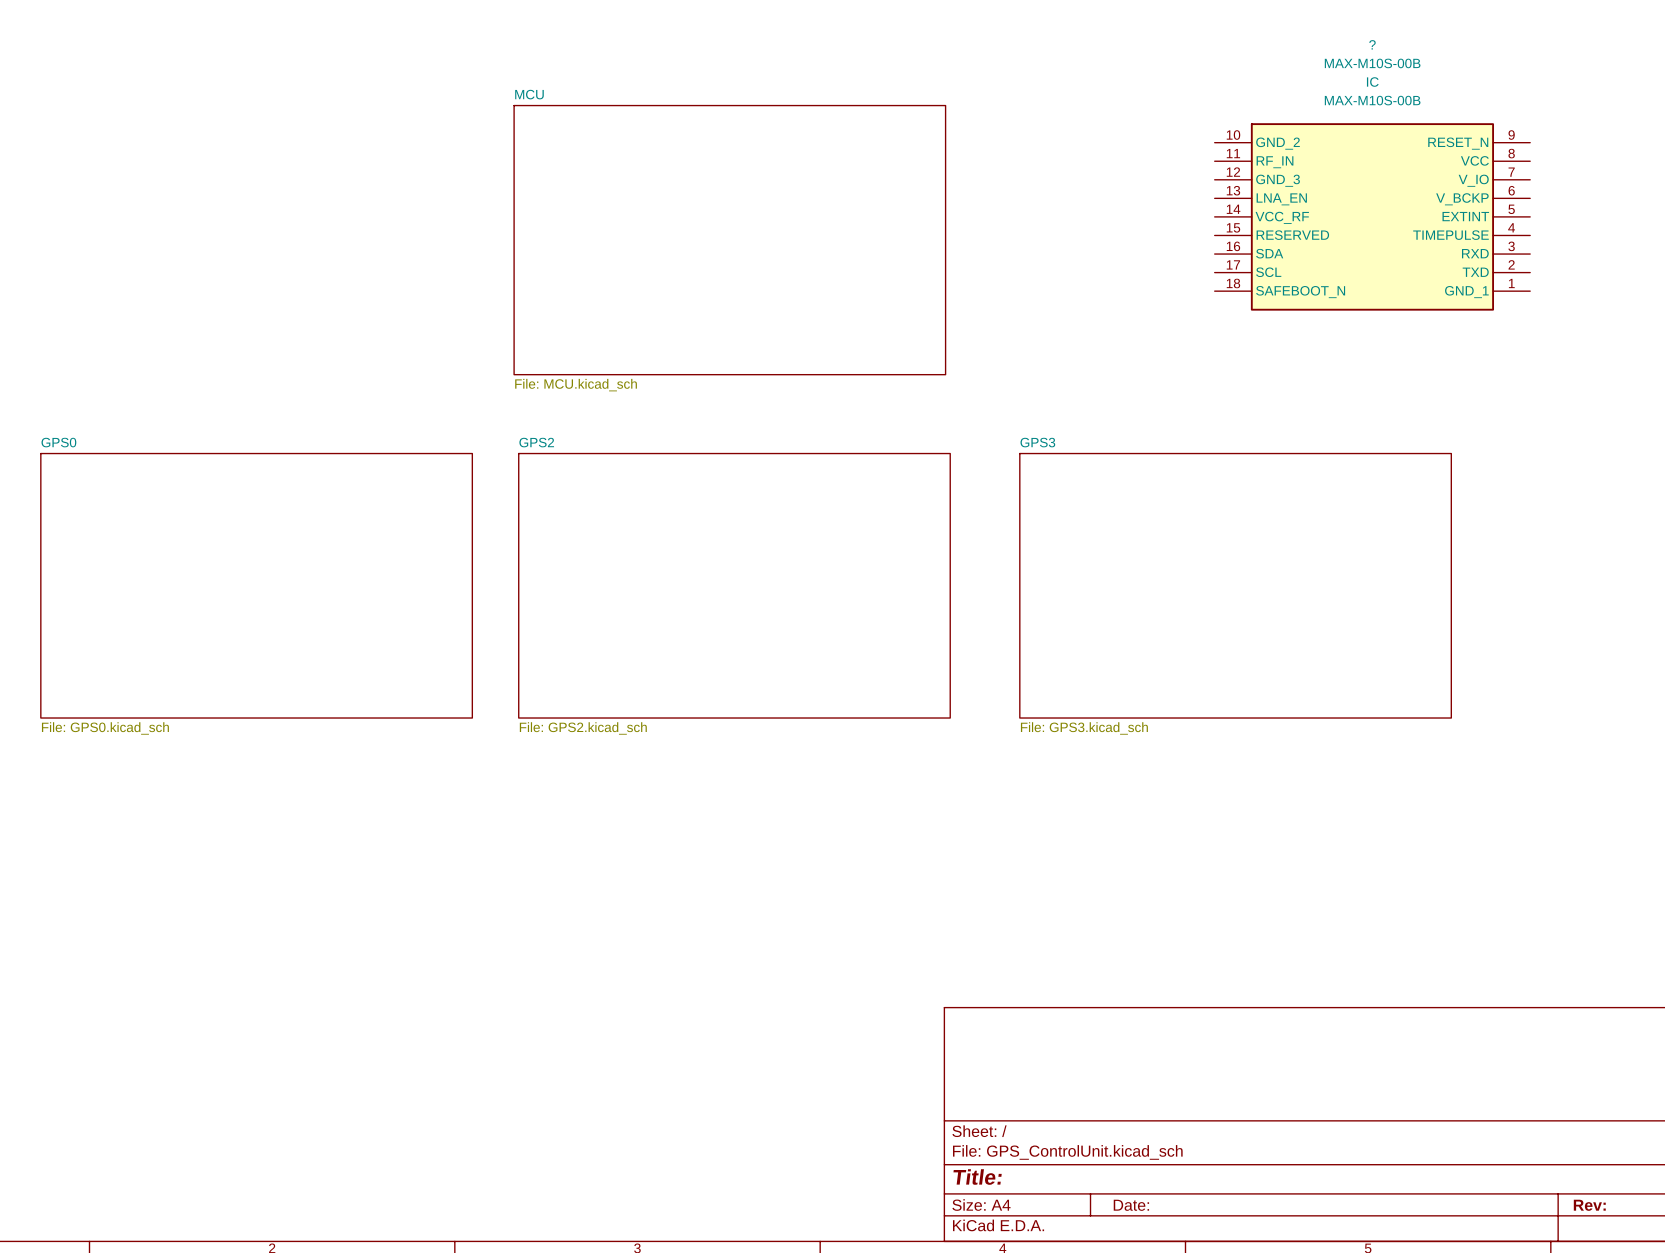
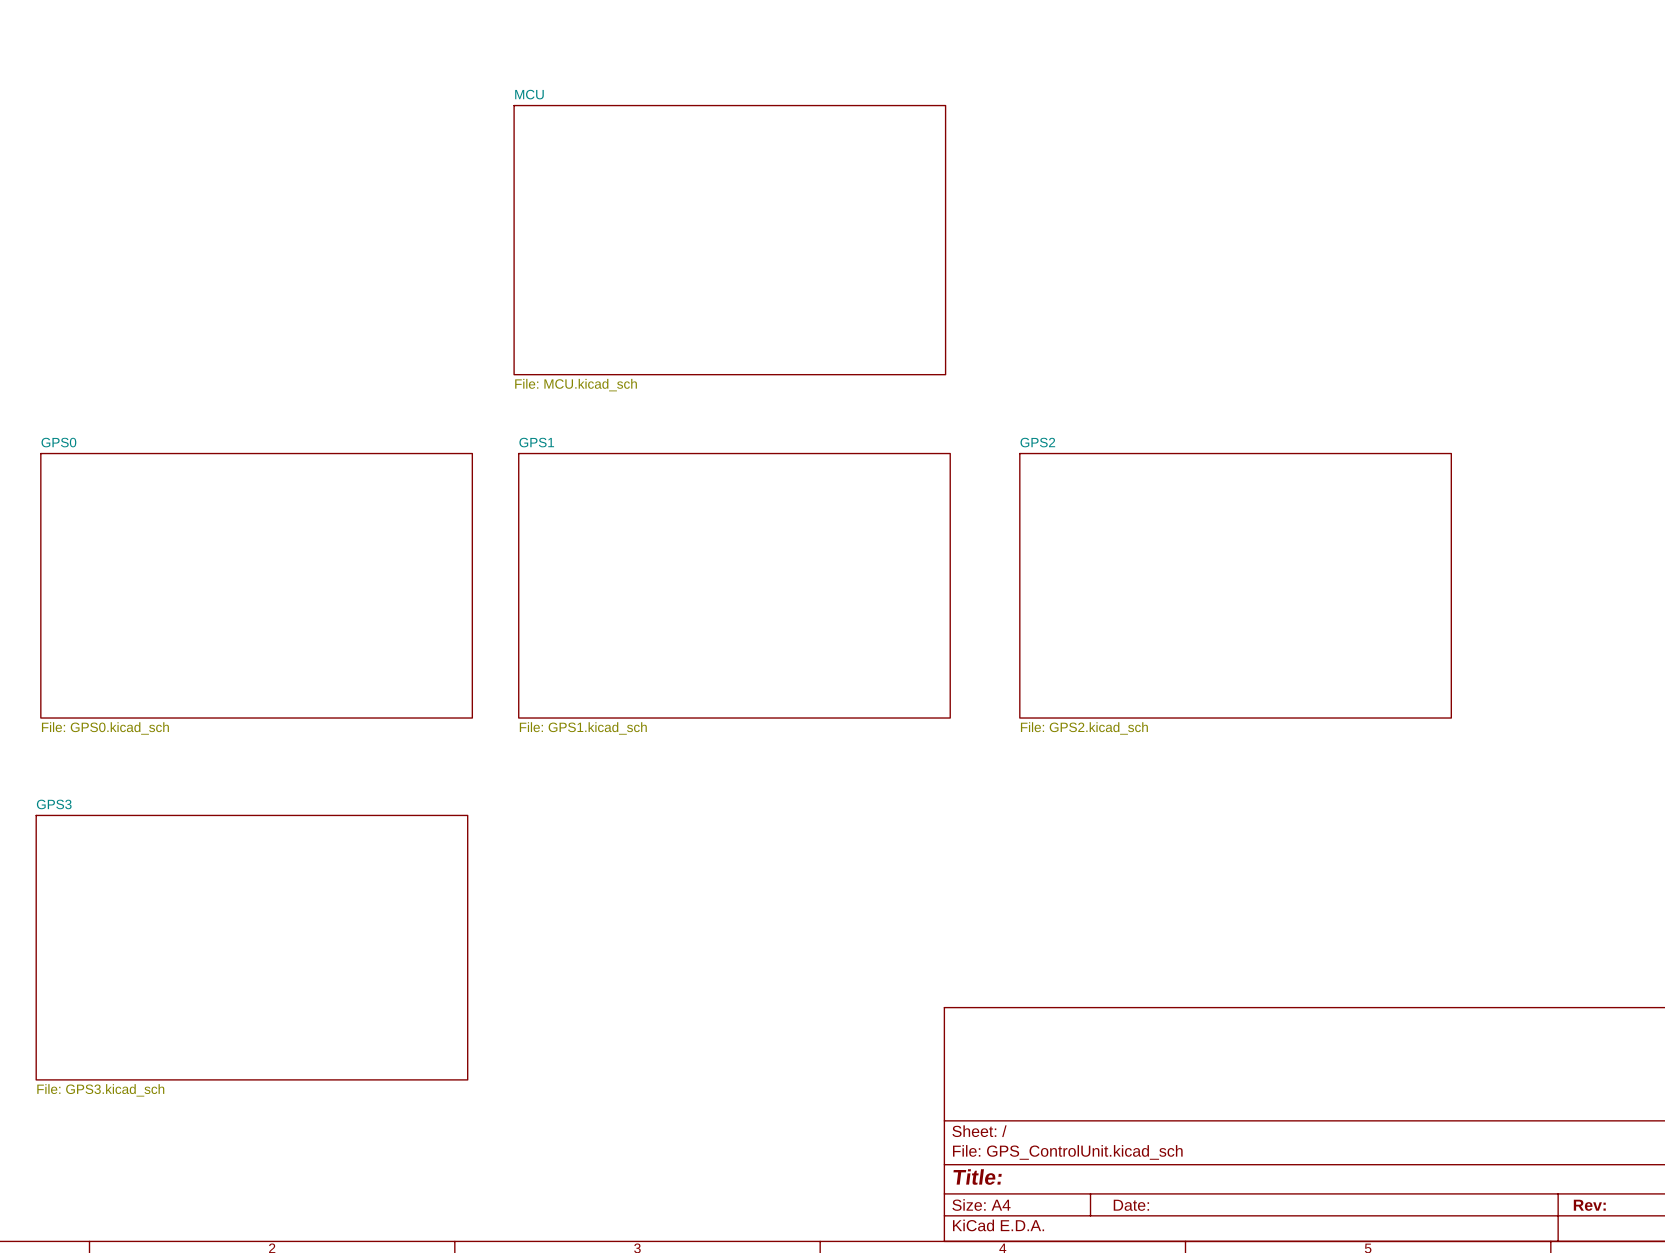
part: MAX-M10S-00B (1372, 216) -> none
sheet GPS2 name: GPS2 (536, 442) -> GPS1 (536, 442)
sheet GPS3 name: GPS3 (1037, 442) -> GPS2 (1037, 442)
sheet GPS2 value: File: GPS2.kicad_sch (583, 728) -> File: GPS1.kicad_sch (583, 728)
sheet GPS3 value: File: GPS3.kicad_sch (1084, 728) -> File: GPS2.kicad_sch (1084, 728)
sheet GPS3: none -> File: GPS3.kicad_sch (251, 947)

